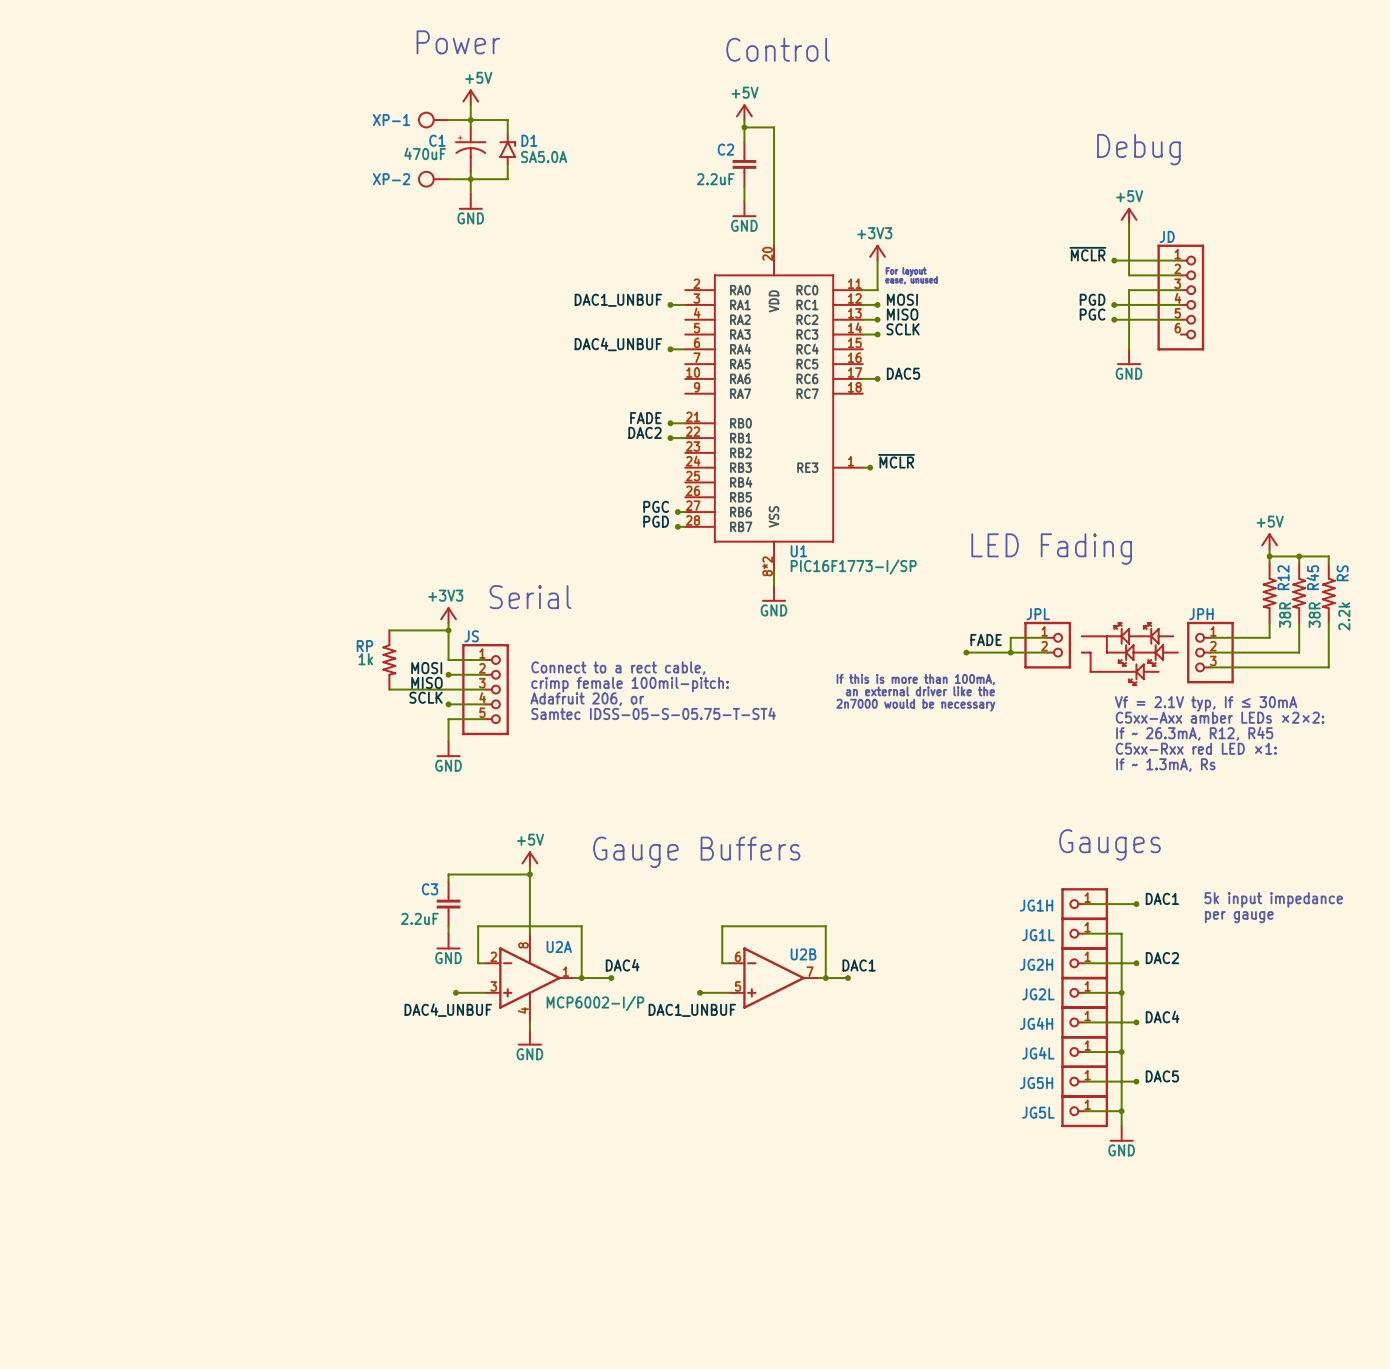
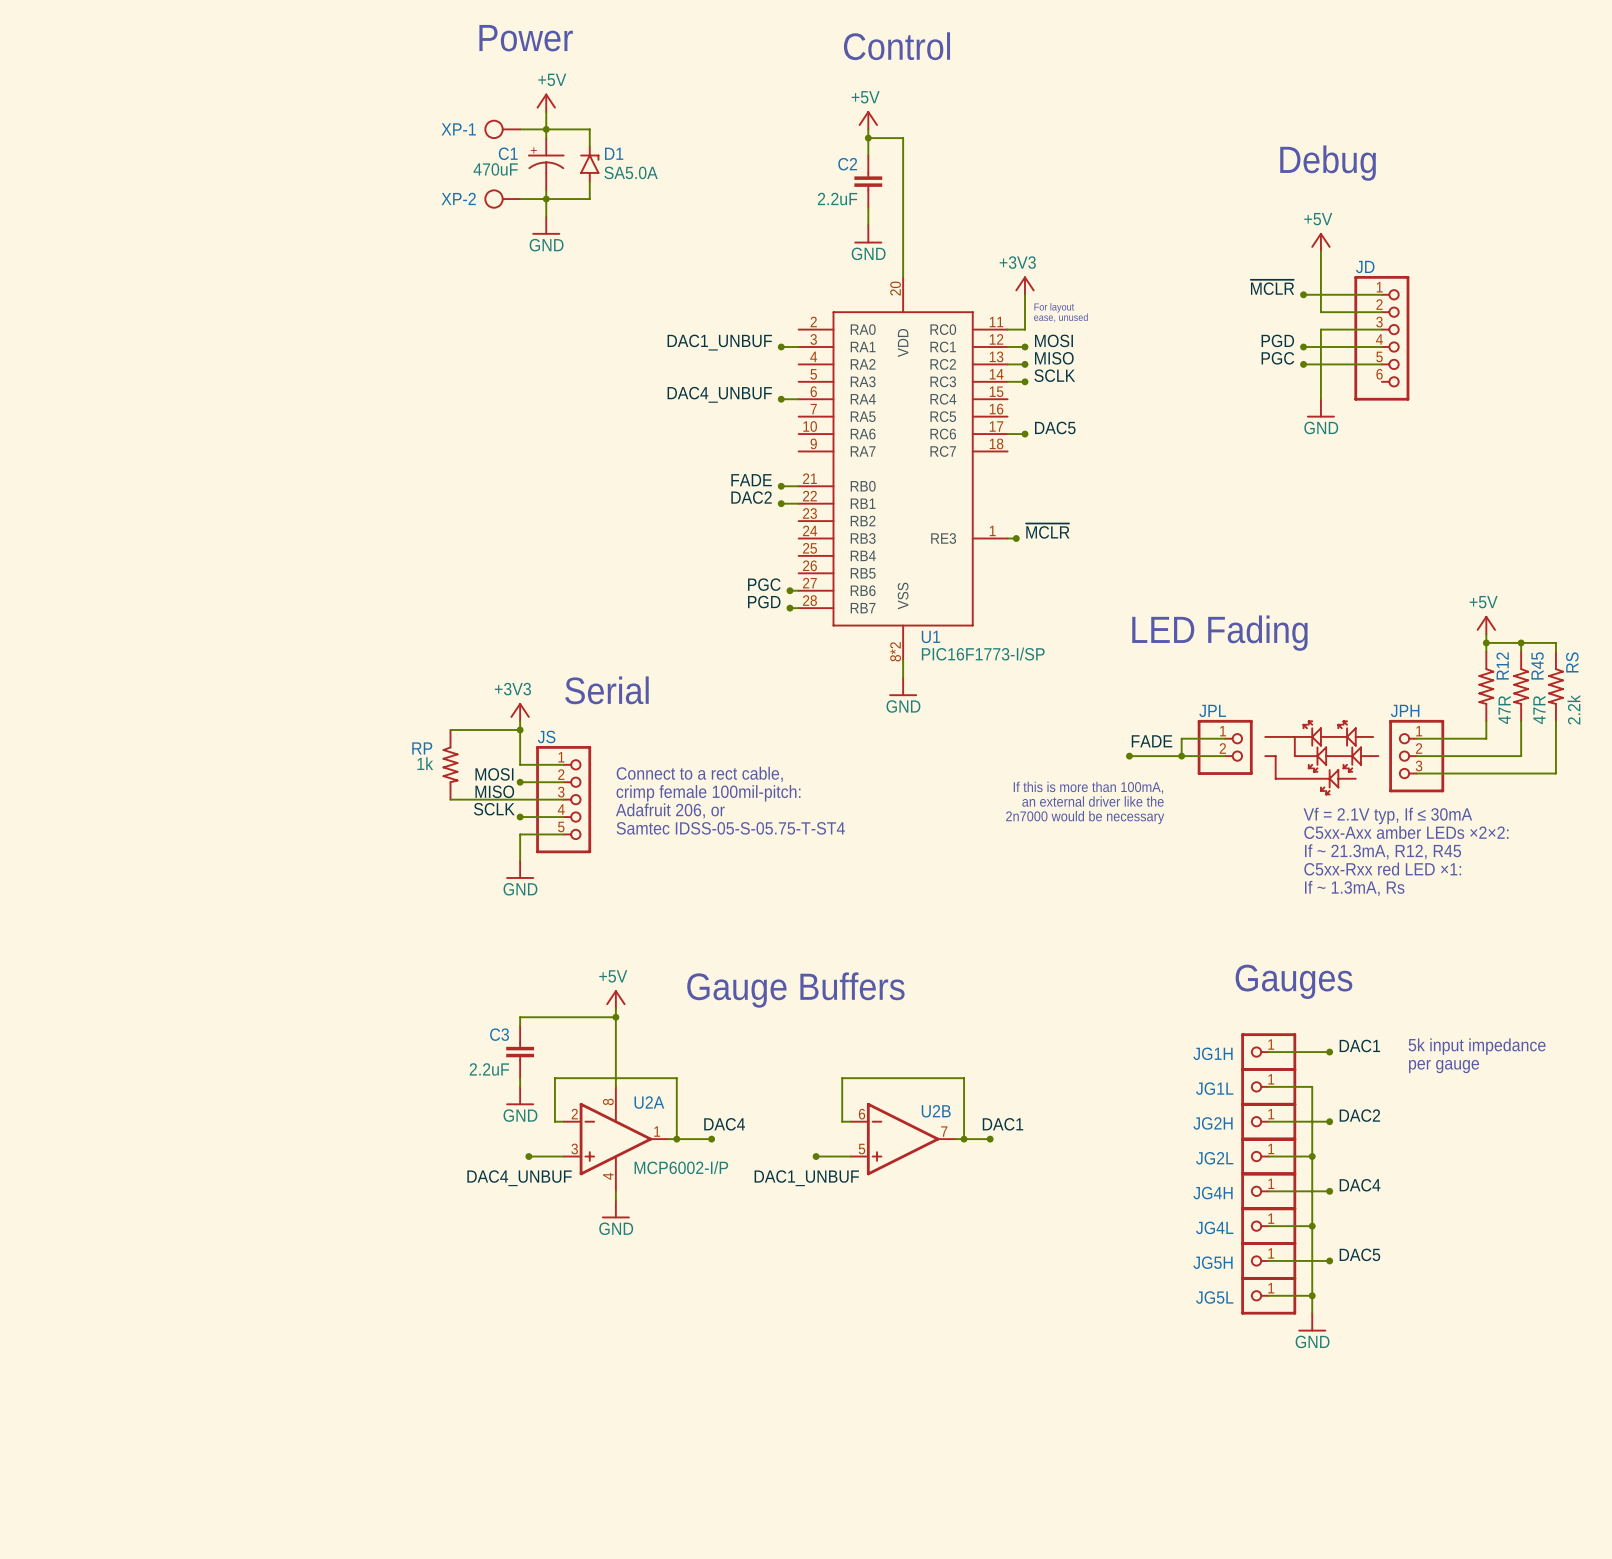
R12 value: 38R (1285, 615) -> 47R (1504, 709)
R45 value: 38R (1314, 615) -> 47R (1539, 709)
text: If ~ 26.3mA, R12, R45 (1194, 733) -> If ~ 21.3mA, R12, R45 (1383, 851)

